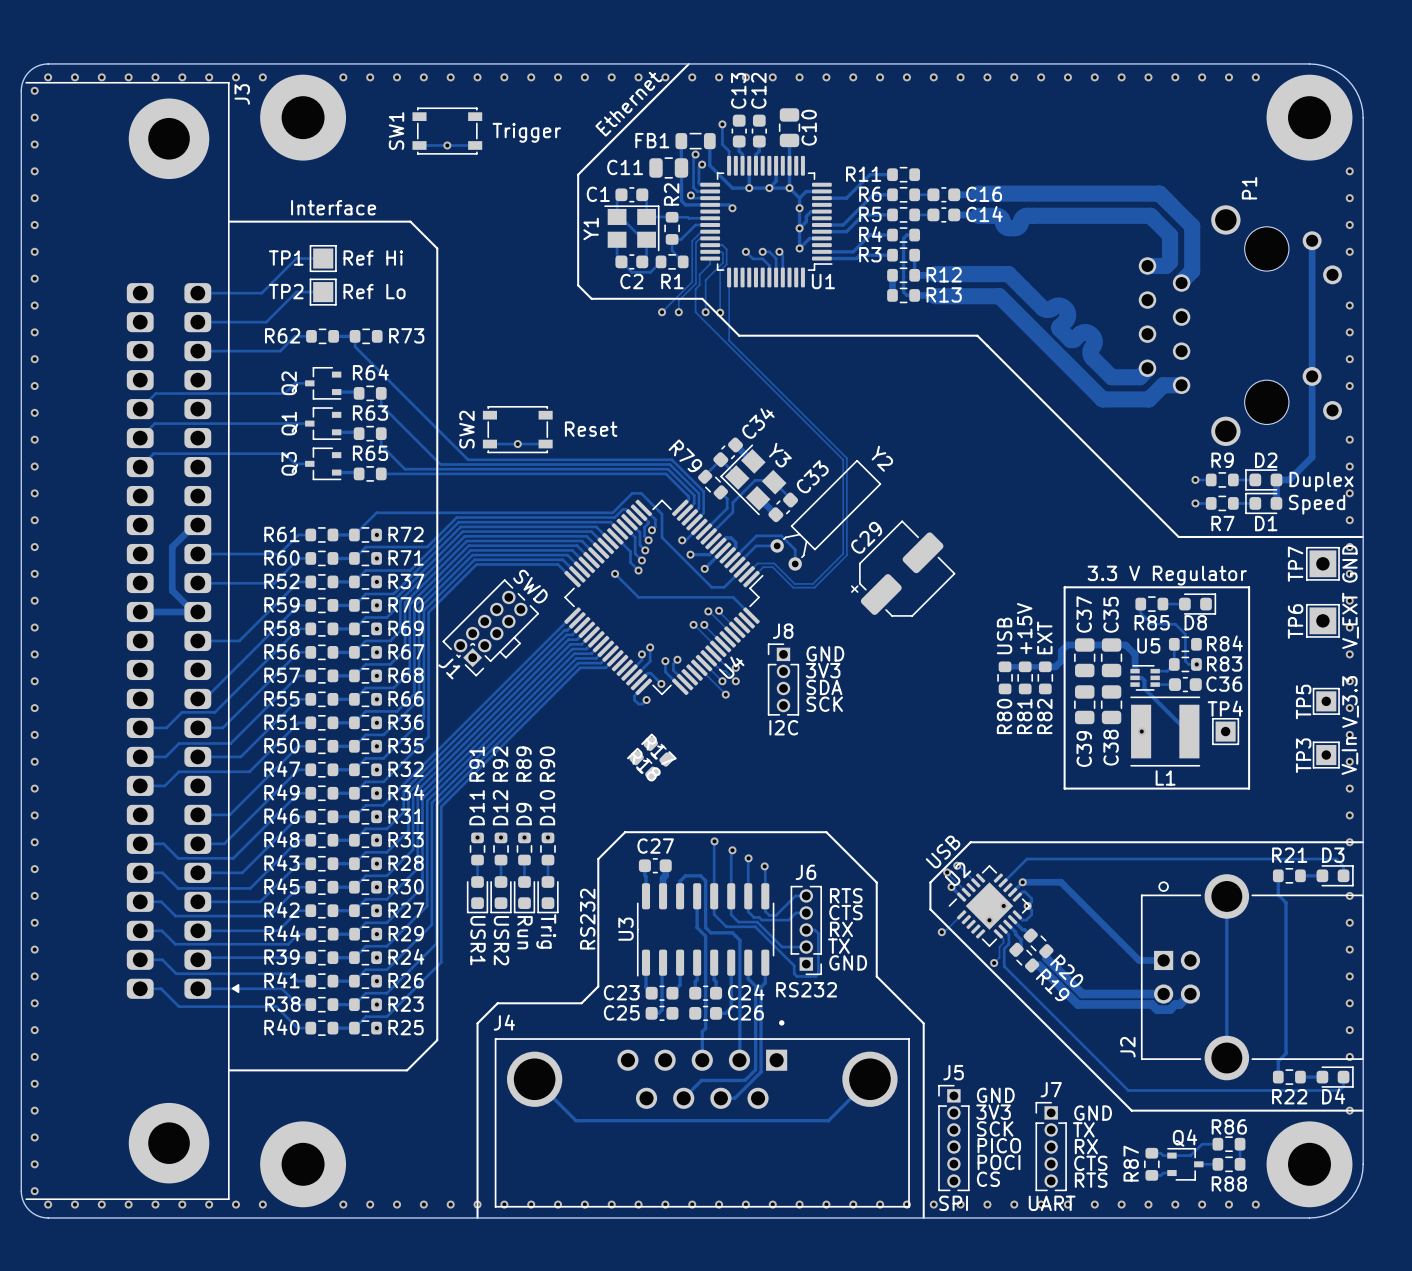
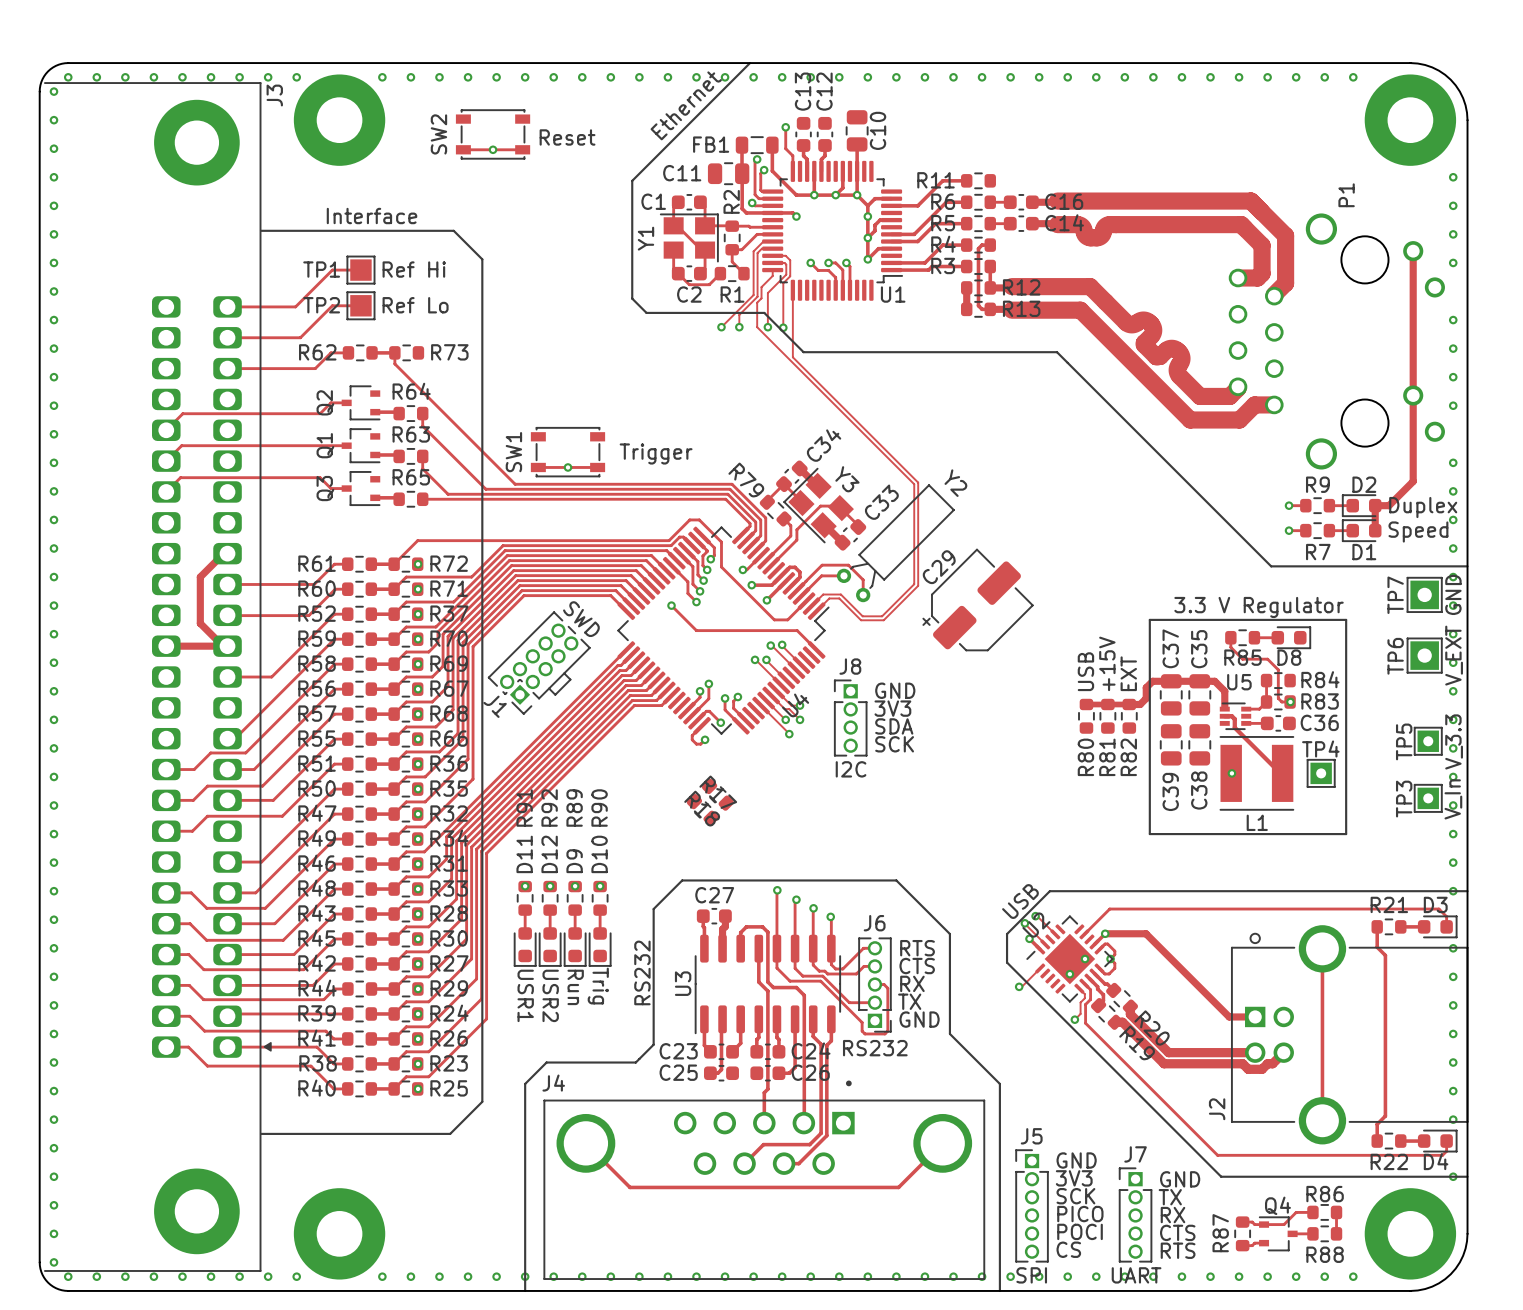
SW1 name: SW1 (396, 131) -> SW2 (438, 134)
text: Trigger (526, 132) -> Reset (567, 137)
SW2 name: SW2 (466, 429) -> SW1 (513, 452)
text: Reset (591, 429) -> Trigger (656, 453)

